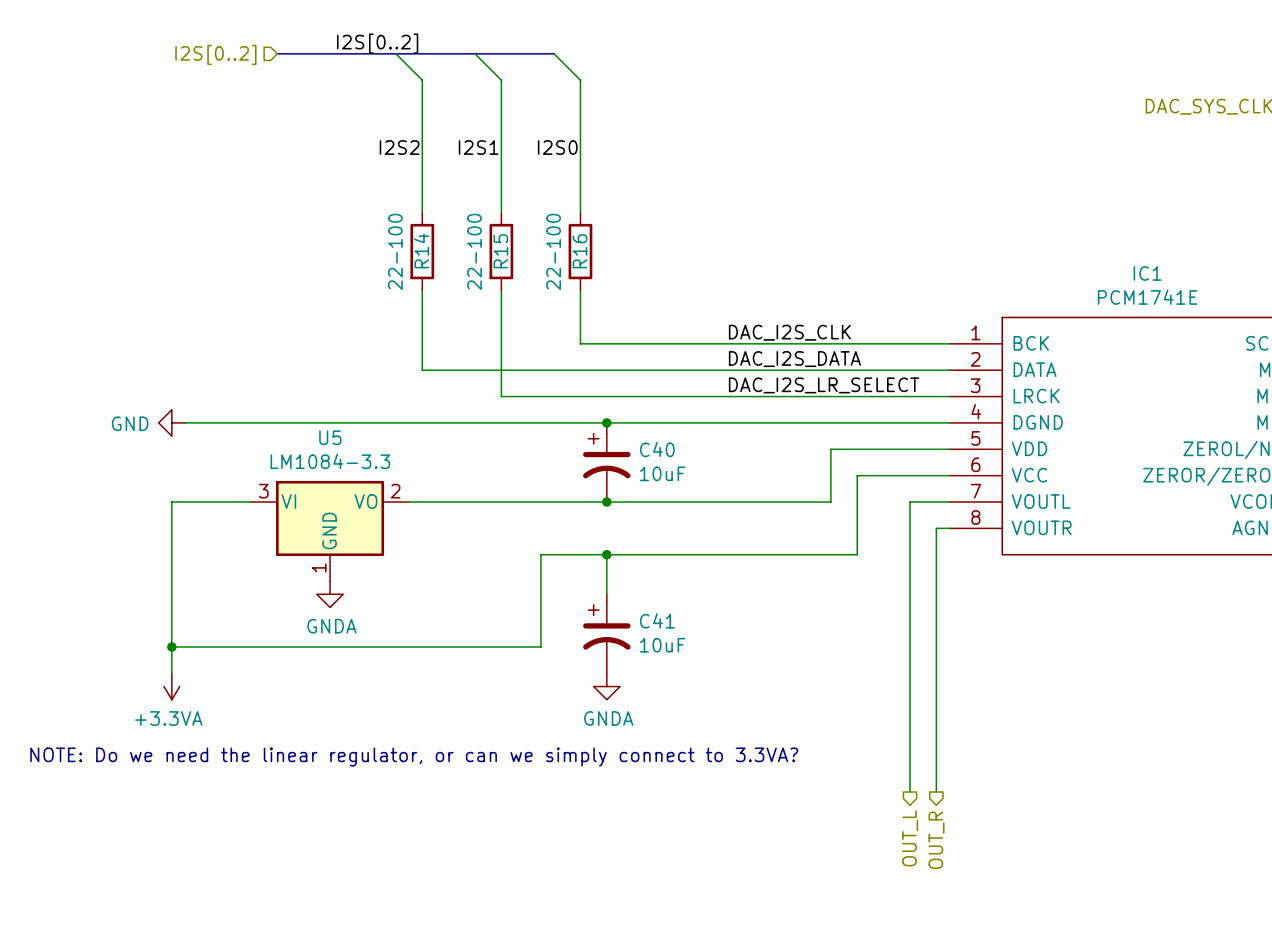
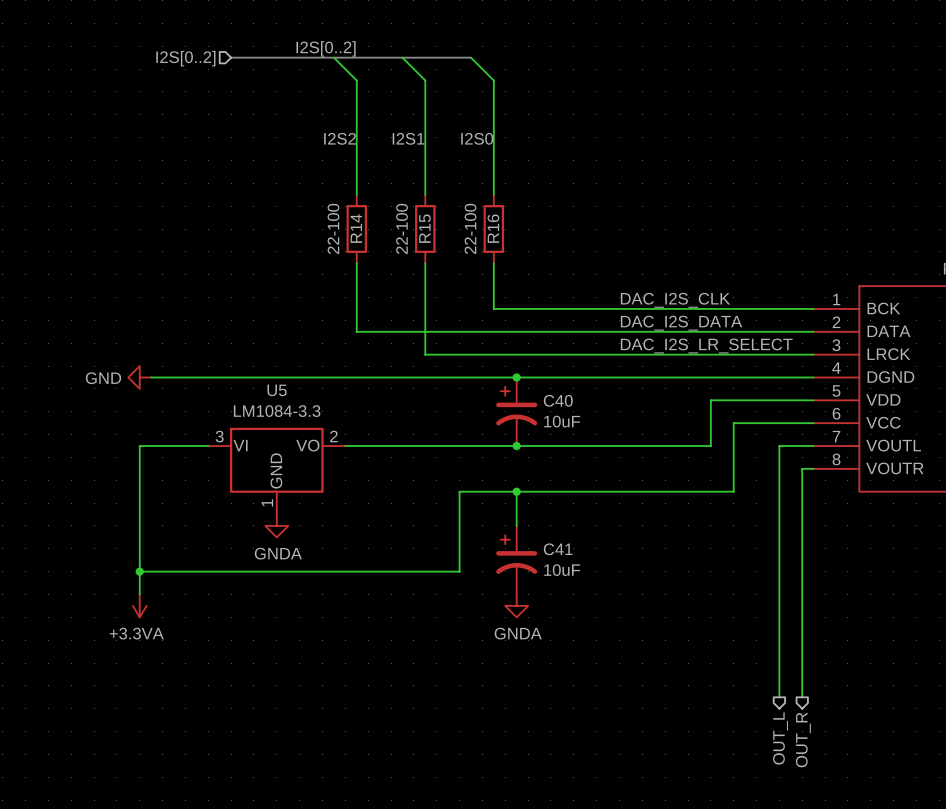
text: NOTE: Do we need the linear regulator, or can we simply connect to 3.3VA? (414, 757) -> none

